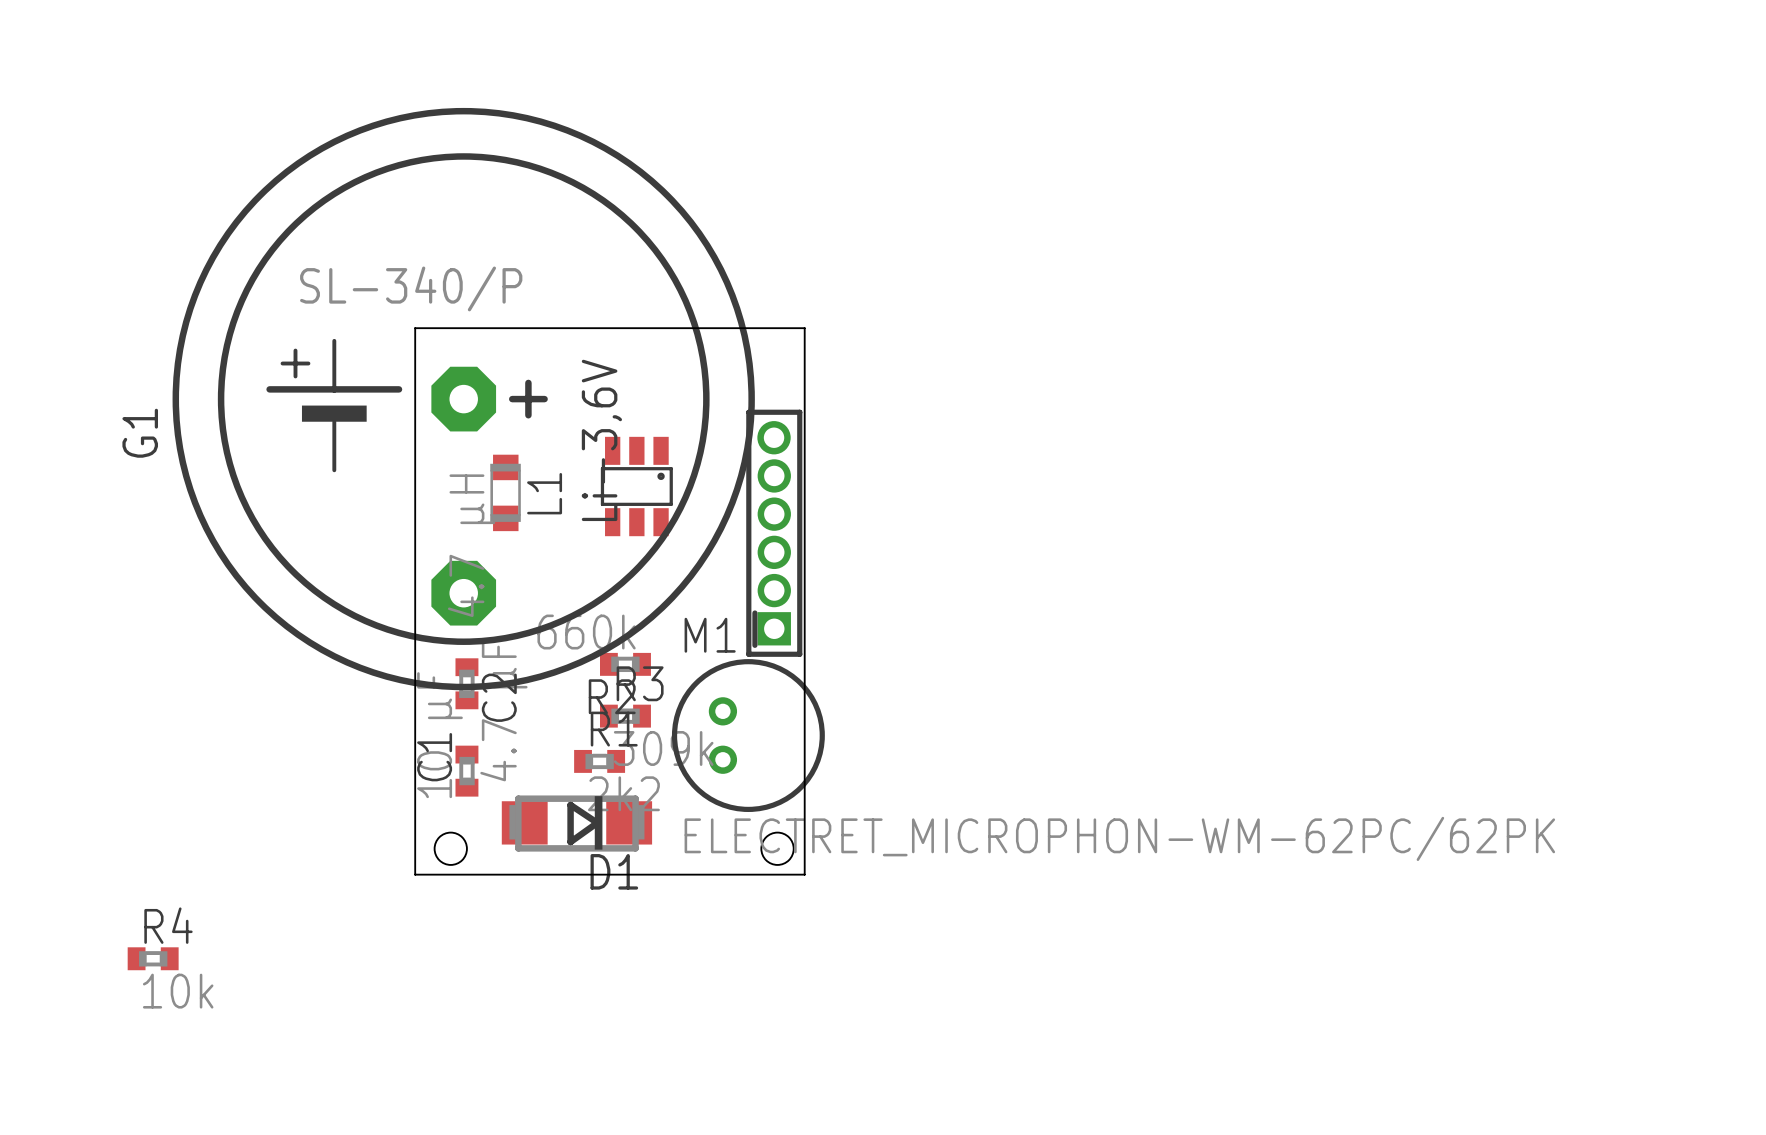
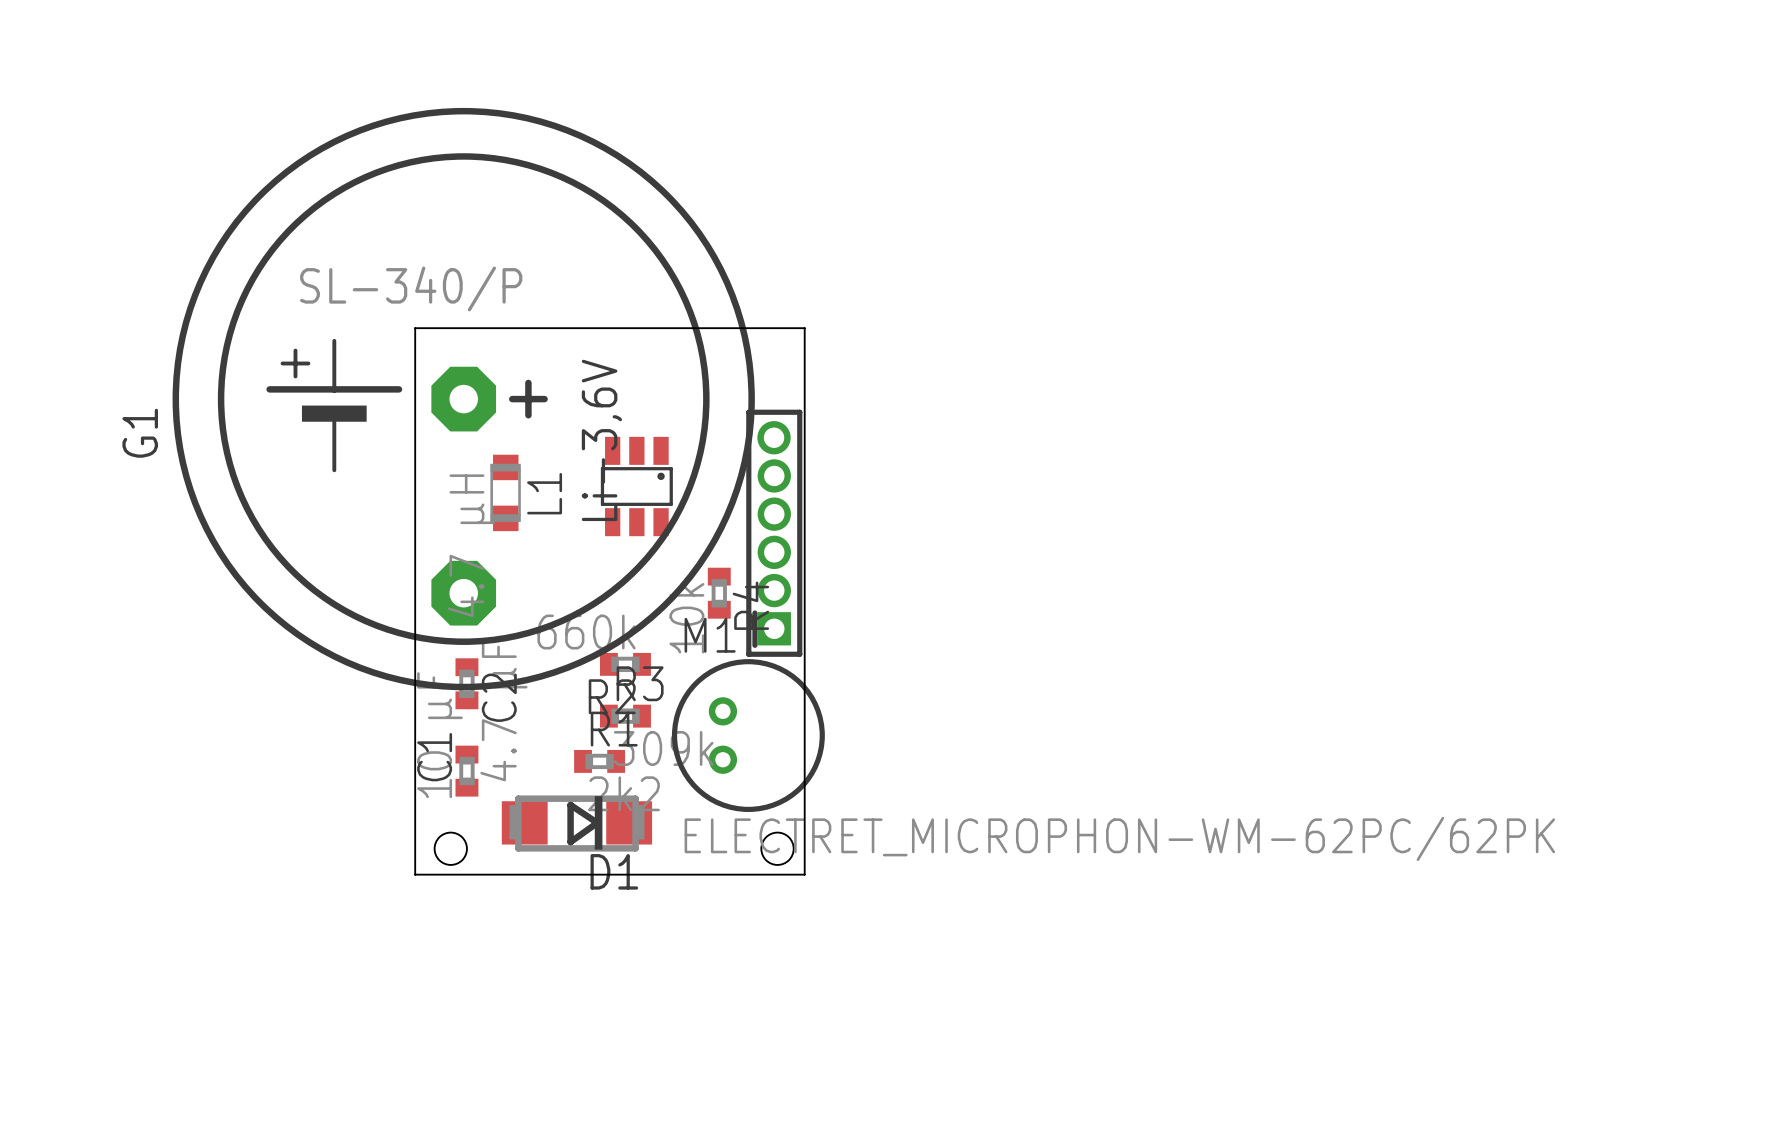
R4 rotation: 0° (153, 958) -> 90° clockwise (719, 593)
R4 position: (153, 958) -> (719, 593)

